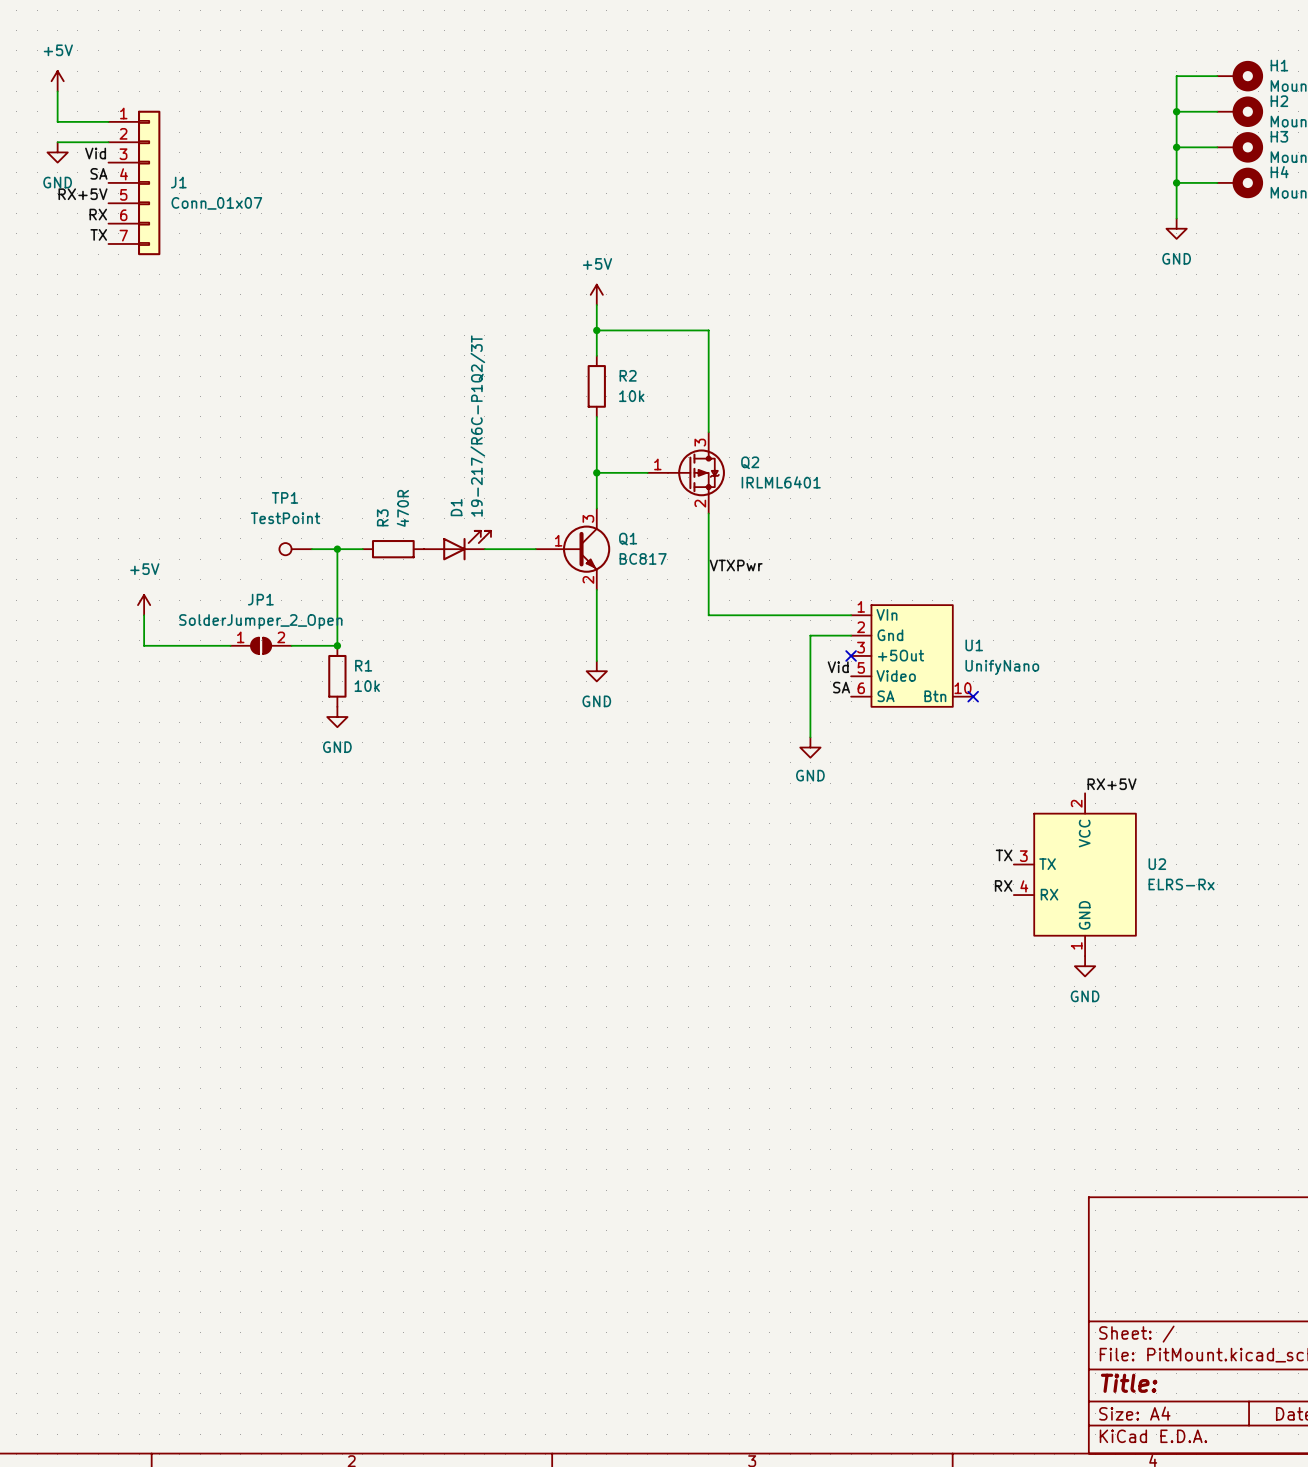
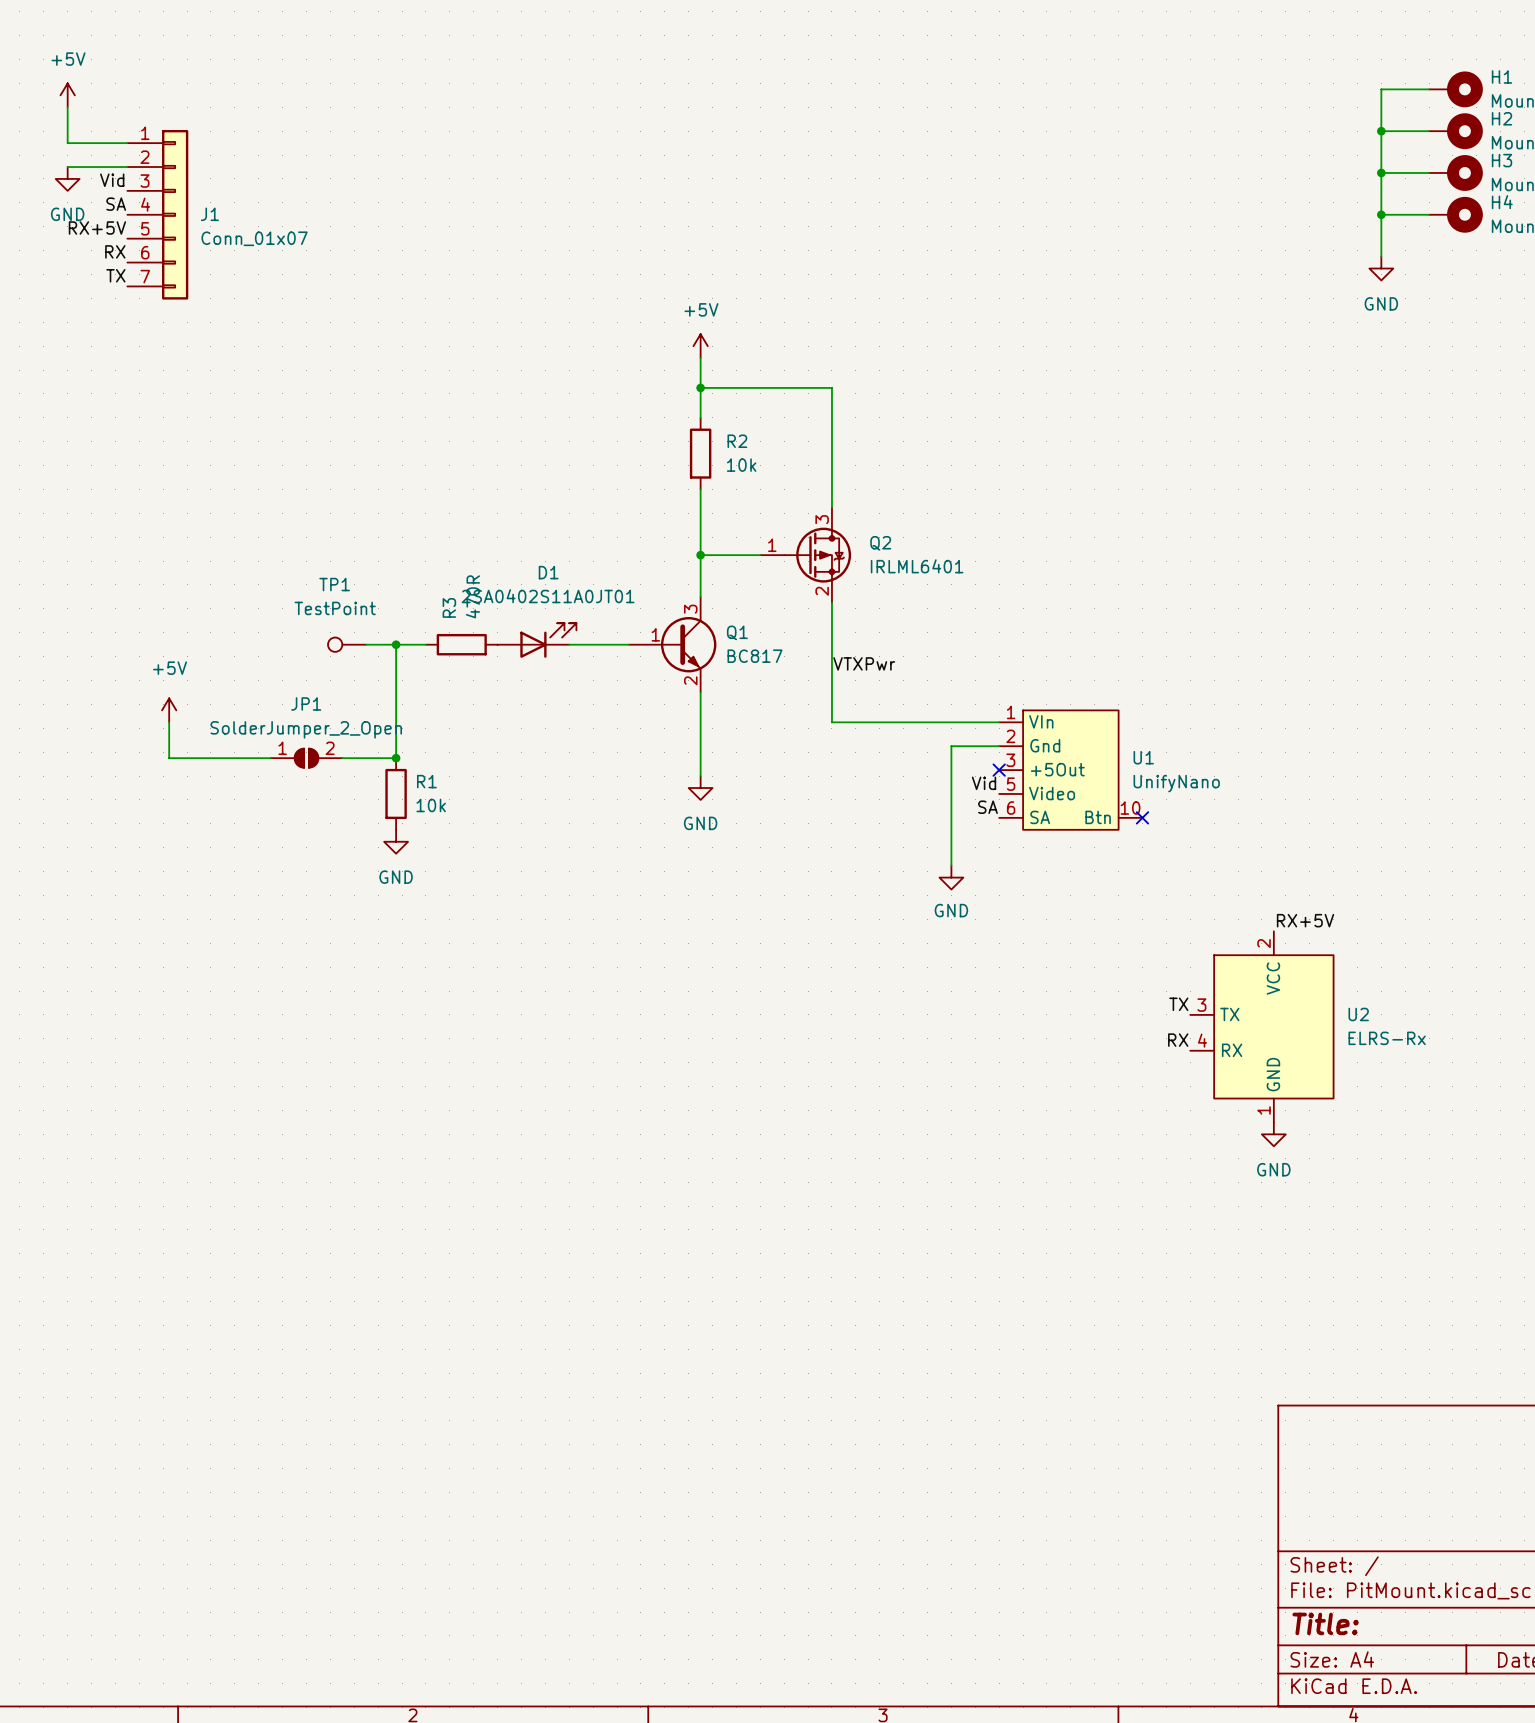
D1 value: 19-217/R6C-P1Q2/3T (477, 426) -> 2SA0402S11A0JT01 (548, 596)
D1 name rotation: 0° (456, 507) -> 90° clockwise (548, 572)

